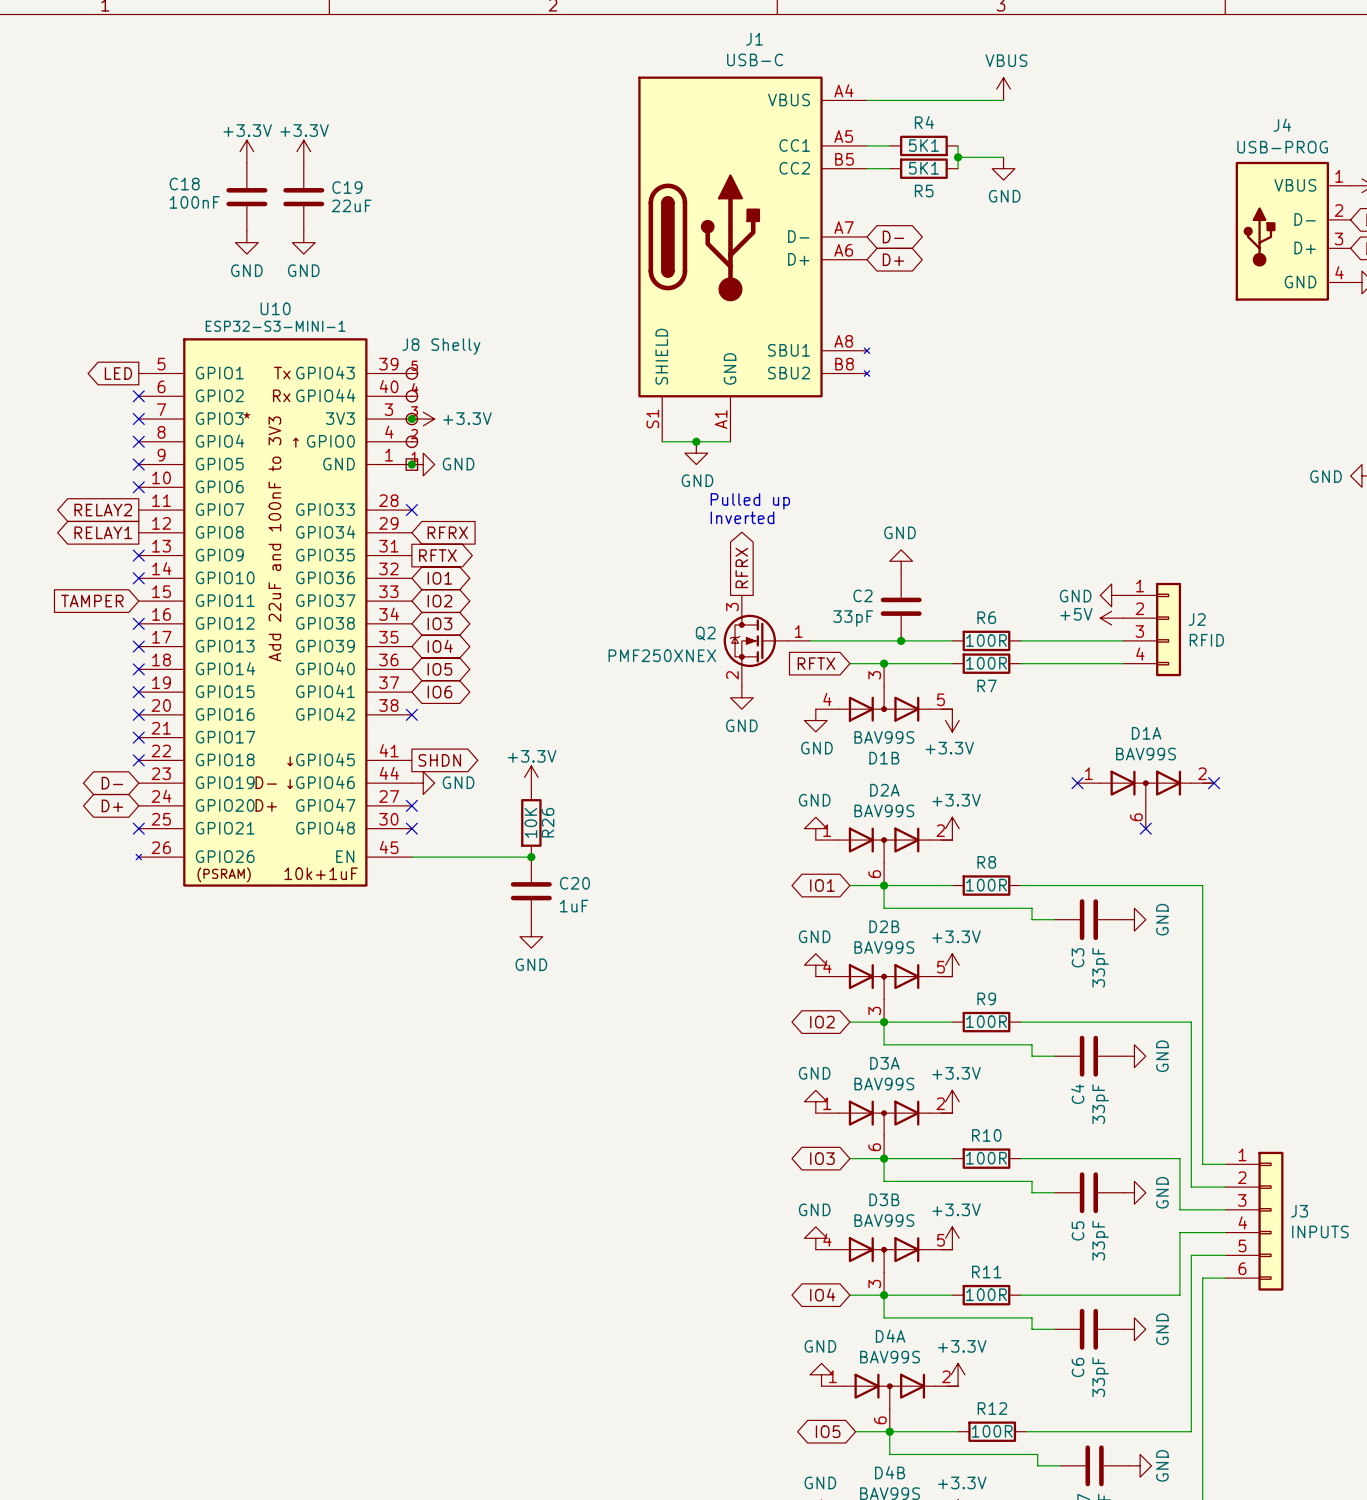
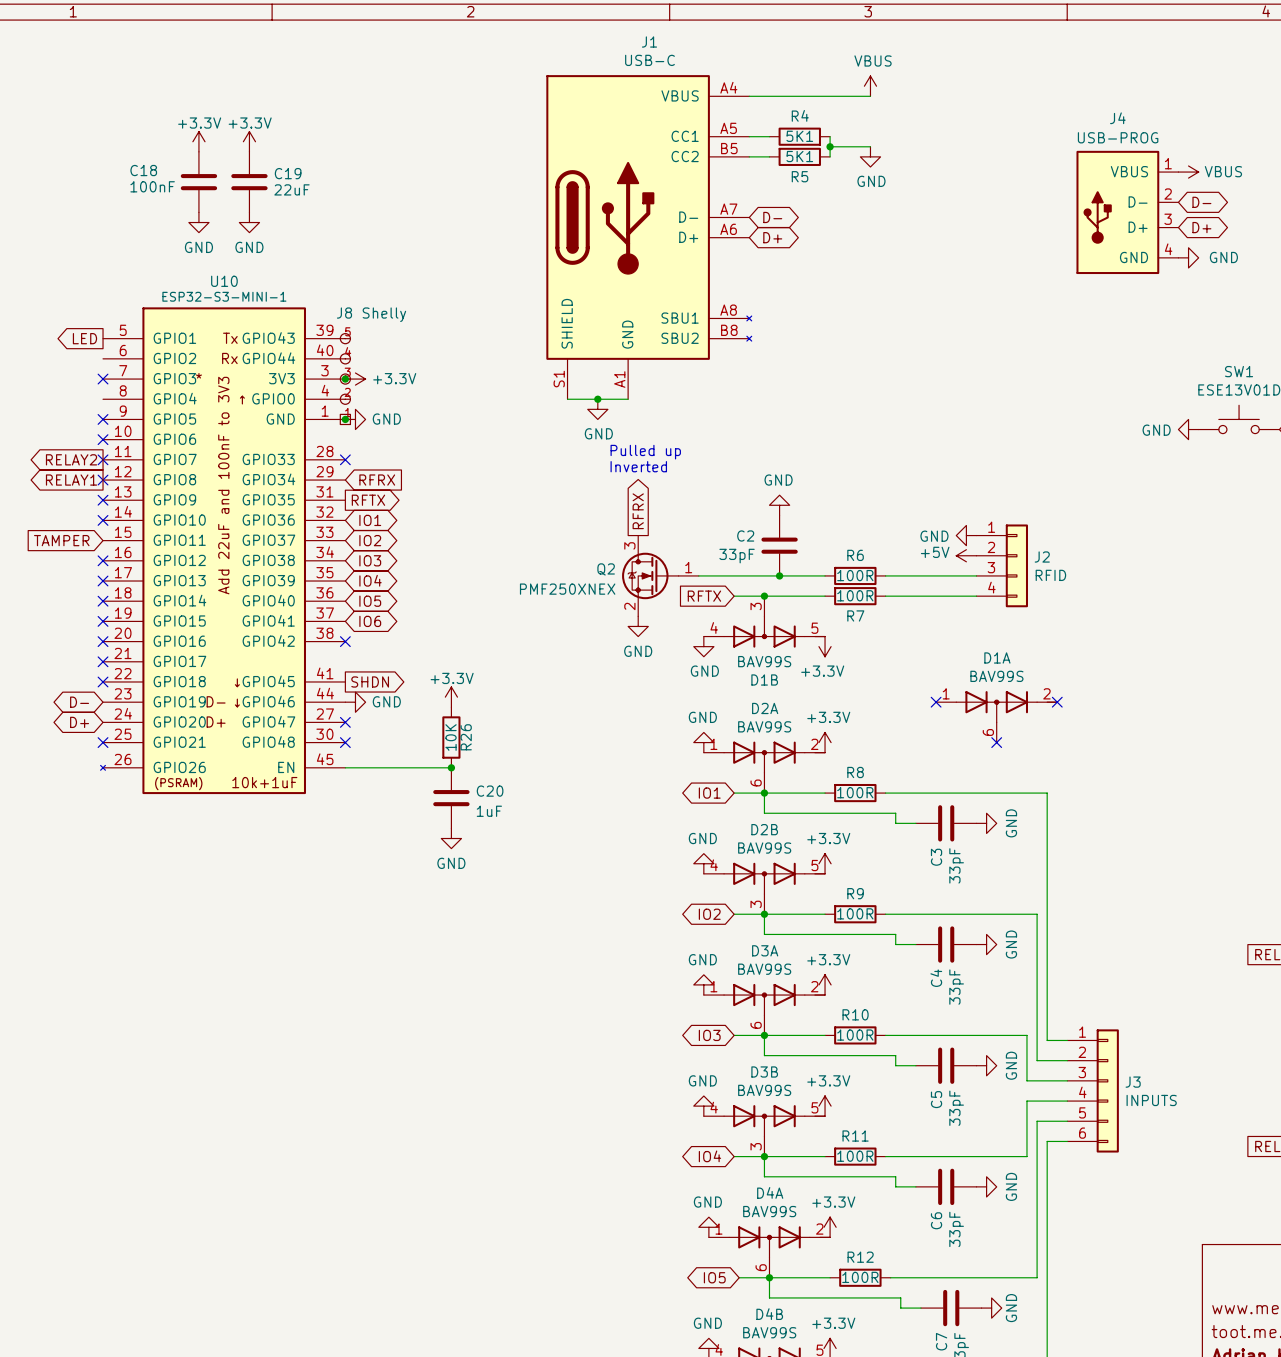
no-connect mark: (138, 396) -> none
no-connect mark: (138, 441) -> none
no-connect mark: none -> (103, 459)
no-connect mark: none -> (103, 480)

